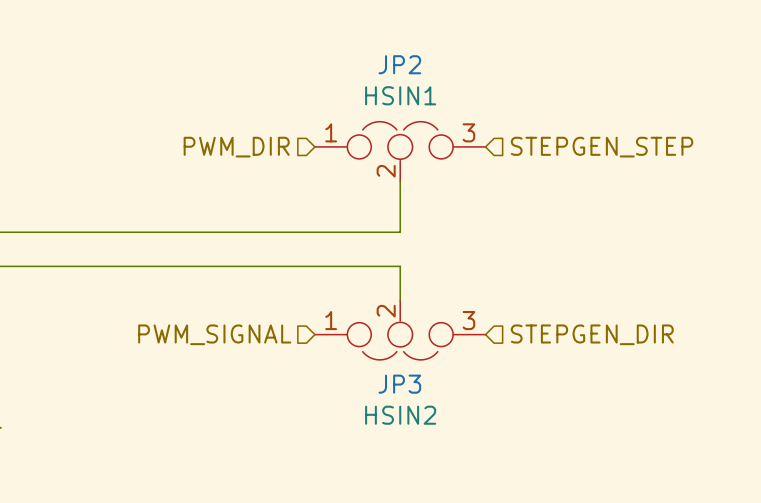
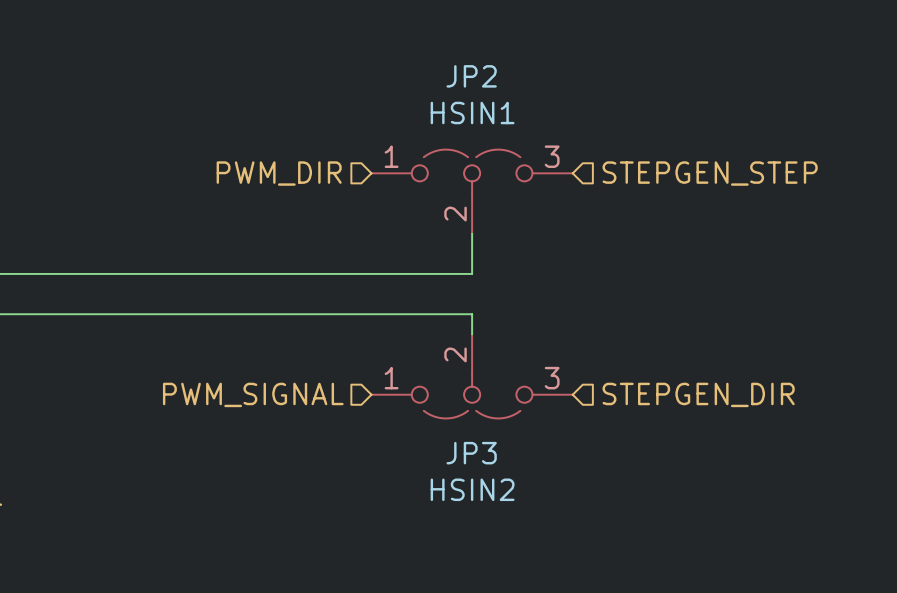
JP2 symbol: [314, 121, 486, 182] -> [371, 149, 573, 234]
JP3 symbol: [314, 300, 486, 360] -> [371, 334, 573, 419]

